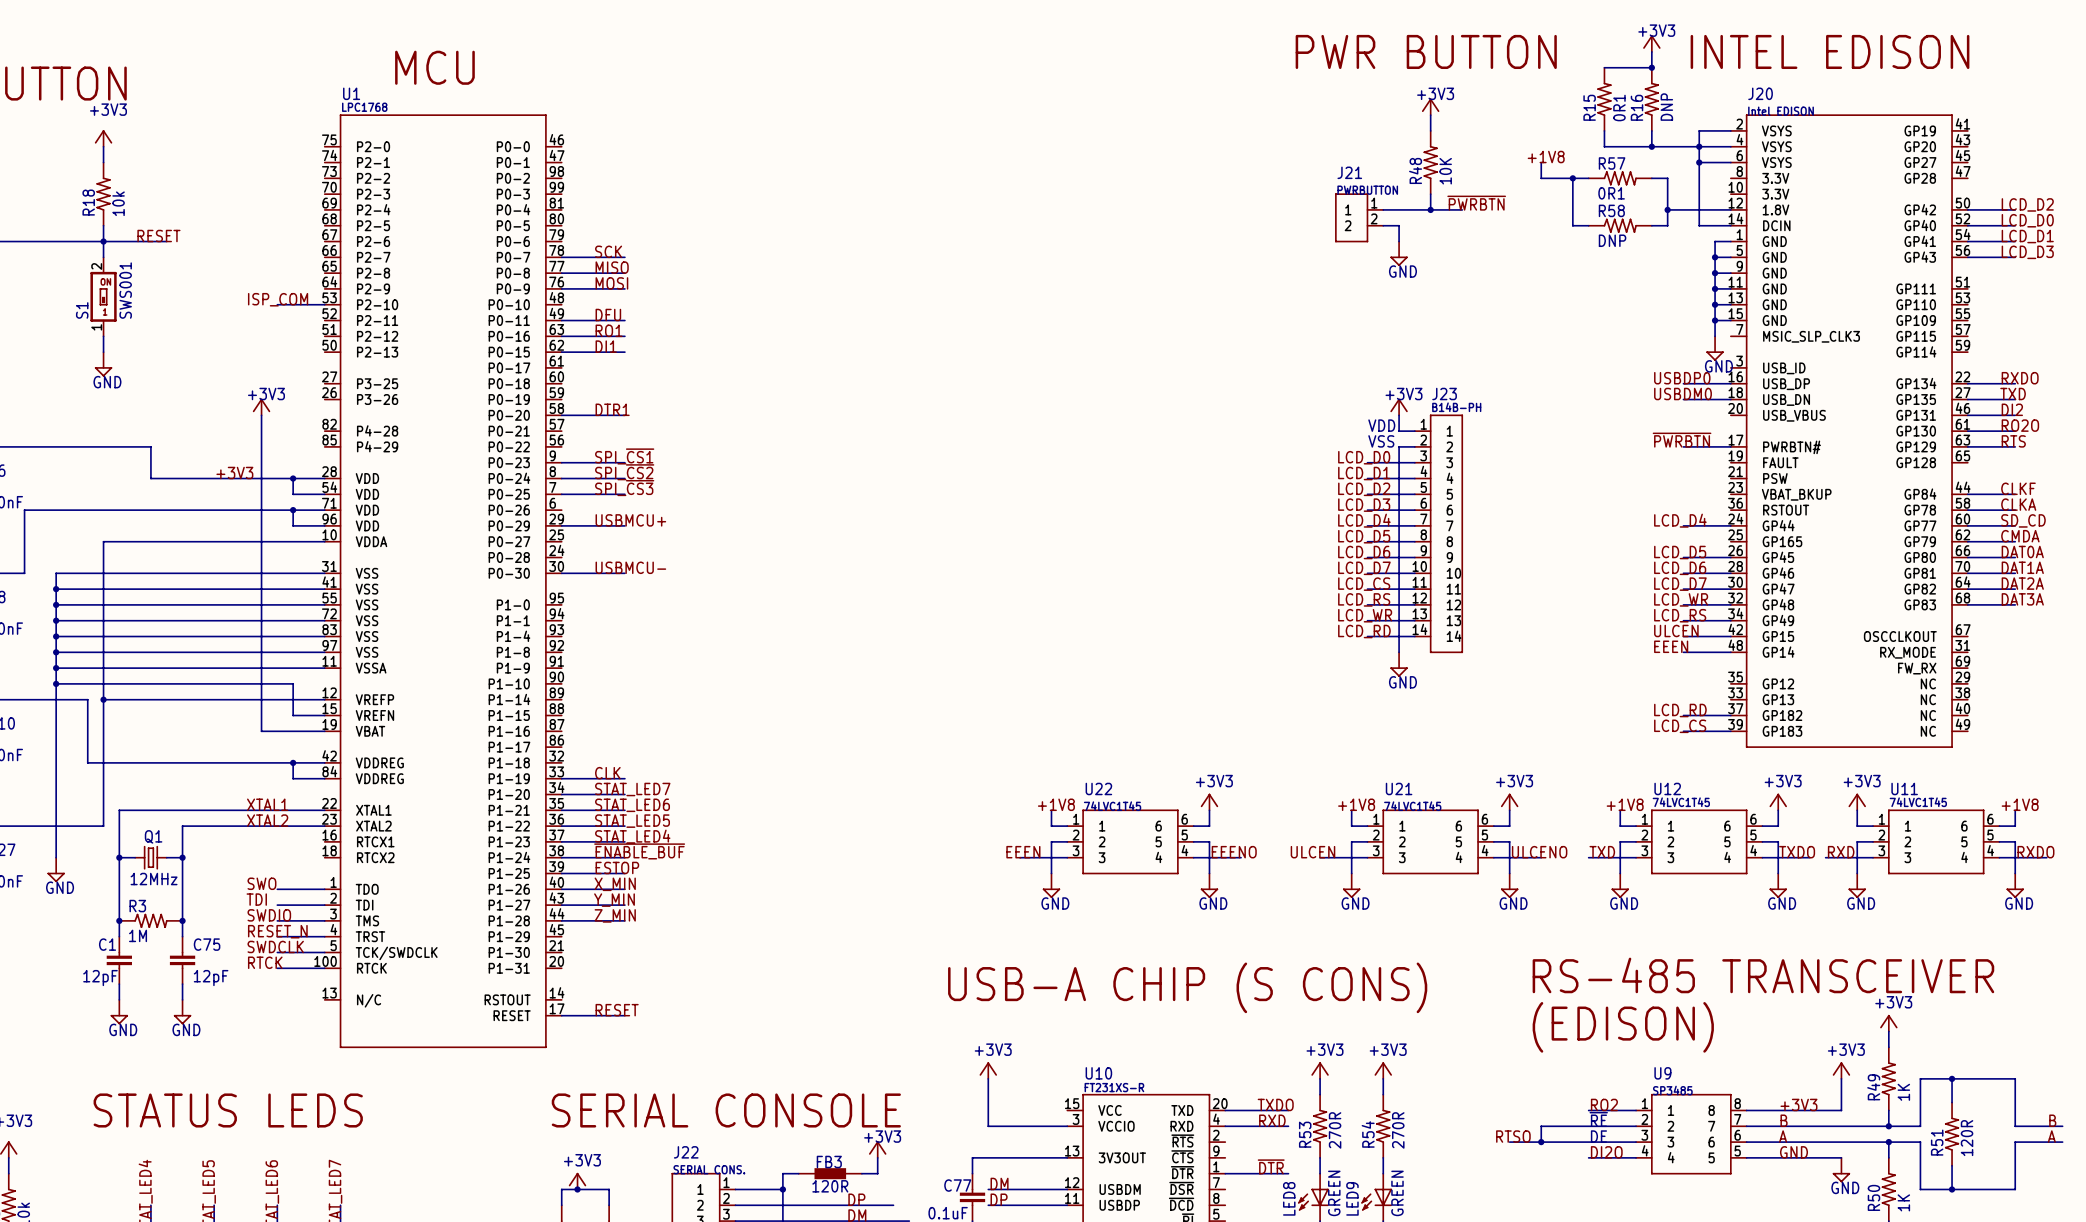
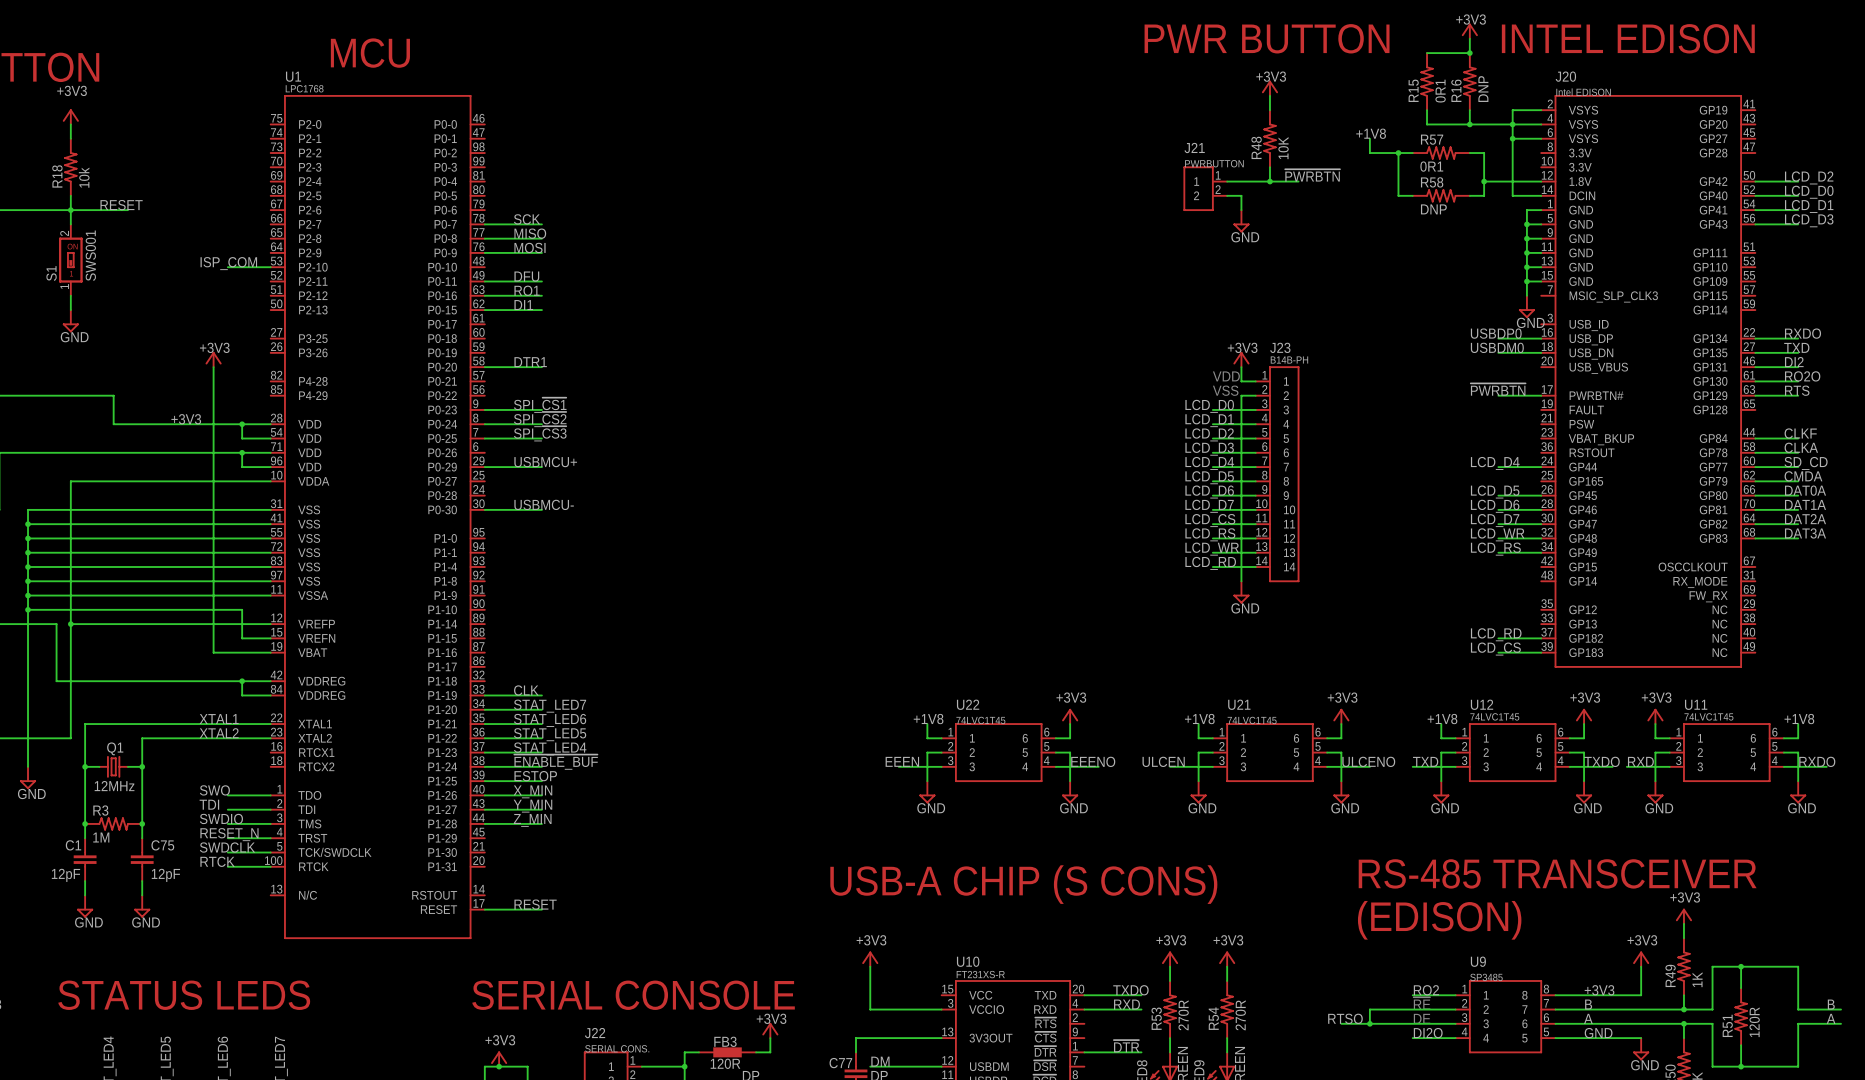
label: ULCEN (1676, 630) -> none
wire: (1683, 636) (1730, 636) -> none
label: EEEN (1671, 646) -> none
wire: (1683, 652) (1730, 652) -> none

